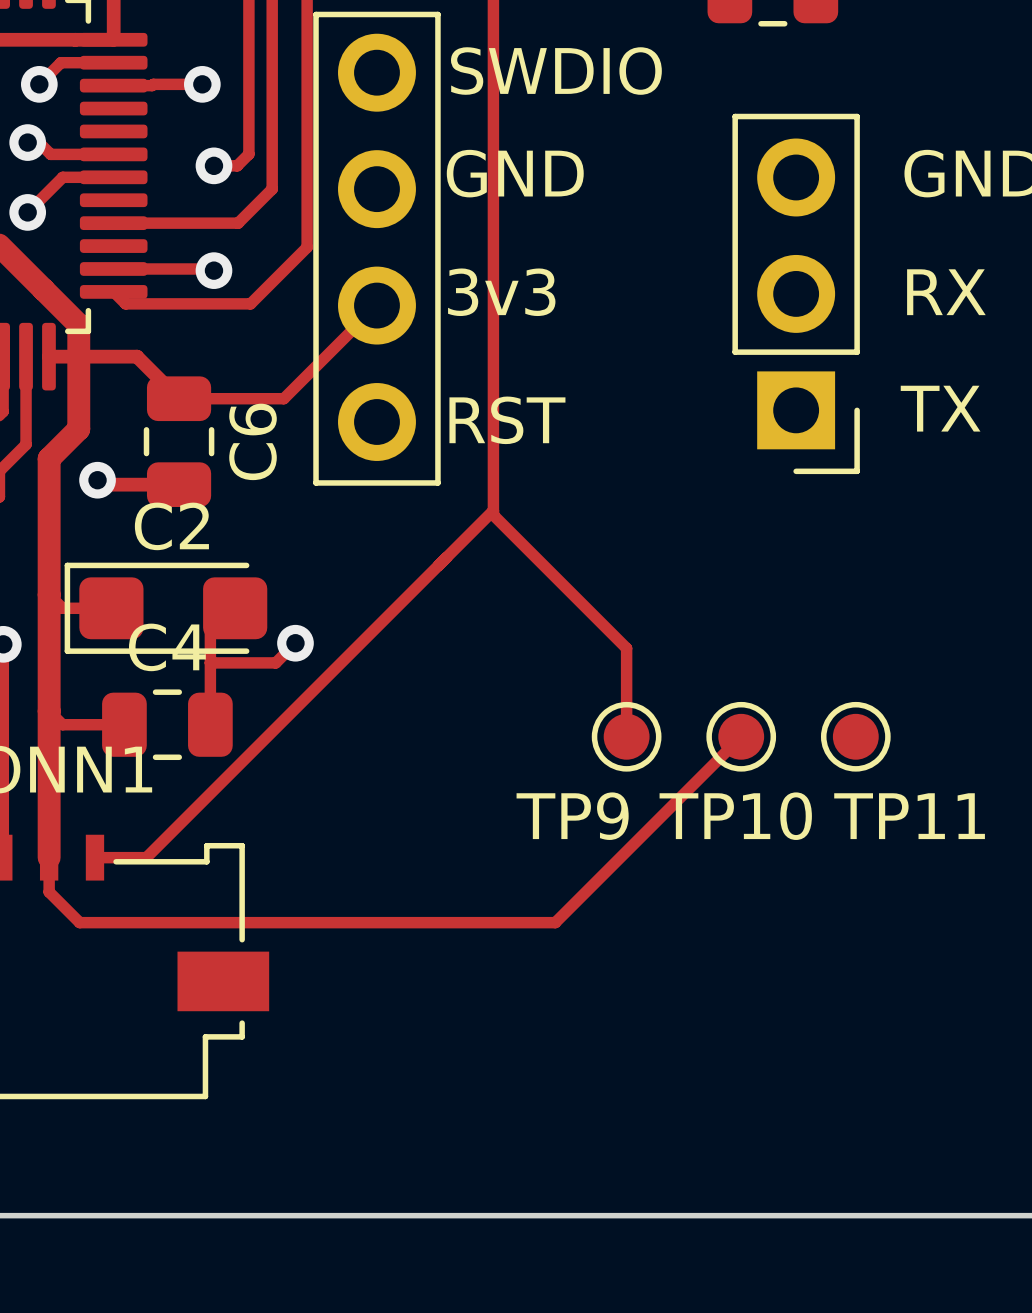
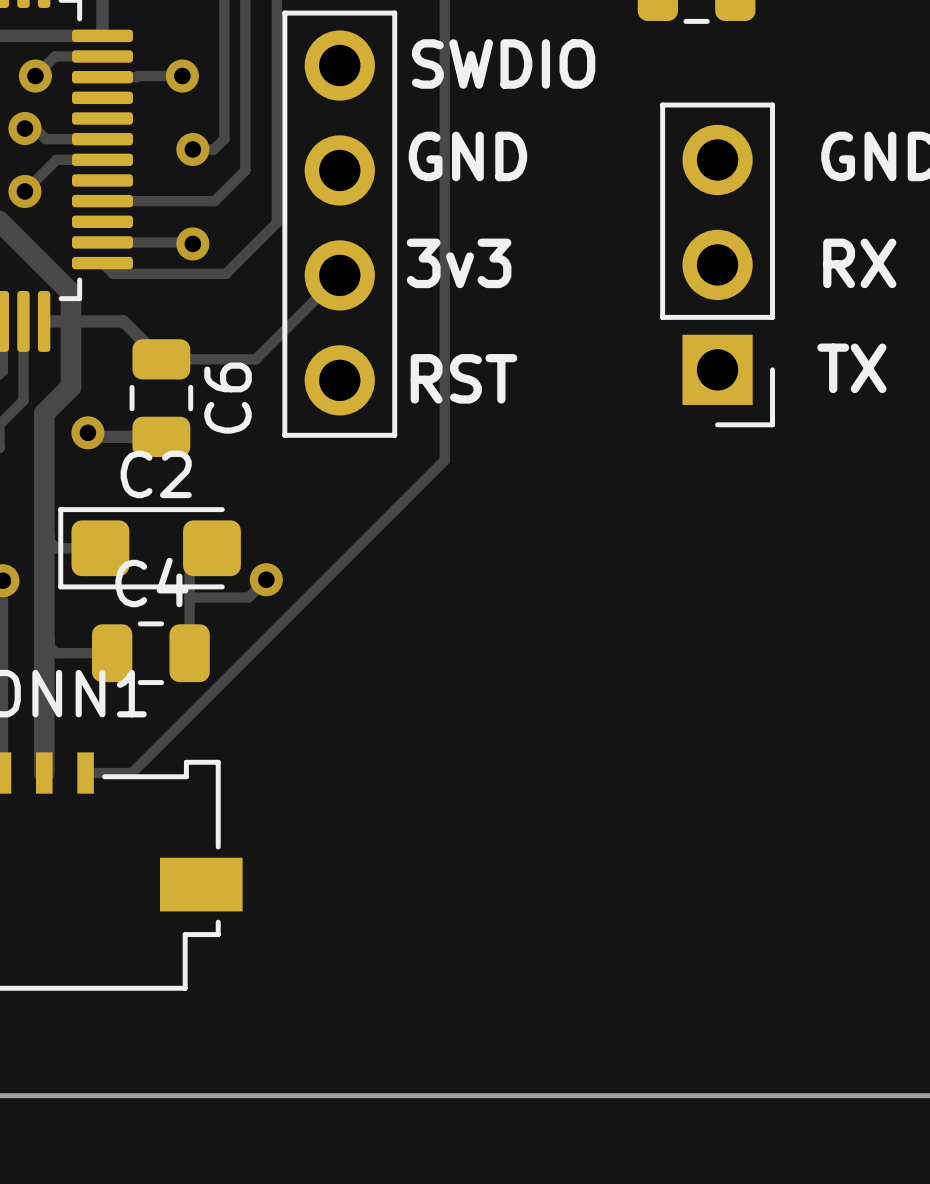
track: (493, 510) (493, 515) (626, 648) (626, 736) -> none
TP9: (626, 736) -> none
track: (741, 736) (555, 922) (79, 922) (49, 892) (49, 857) -> none
TP10: (741, 736) -> none
TP11: (855, 736) -> none

